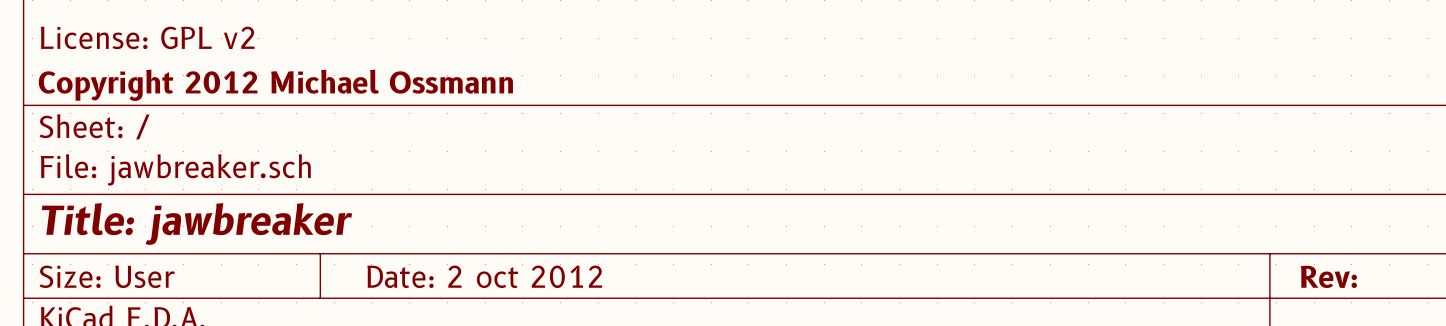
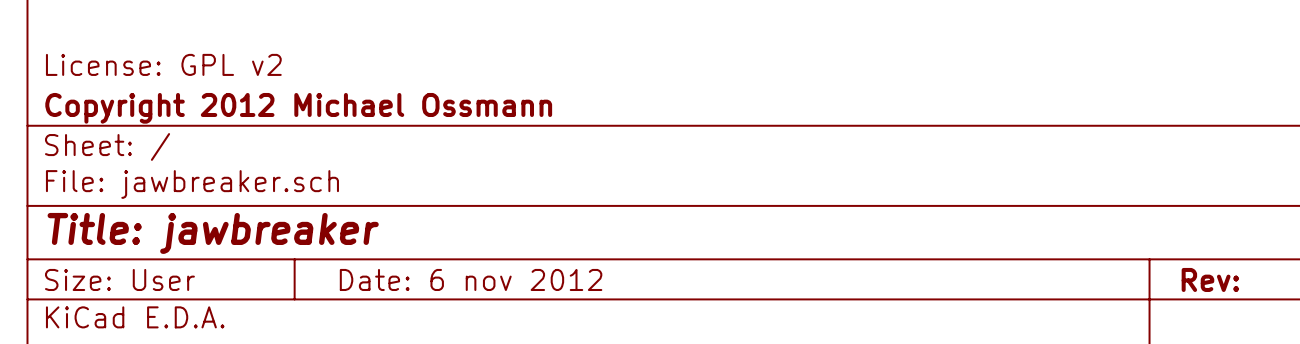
title block: Date: 2 oct 2012 (484, 276) -> Date: 6 nov 2012 (471, 279)

